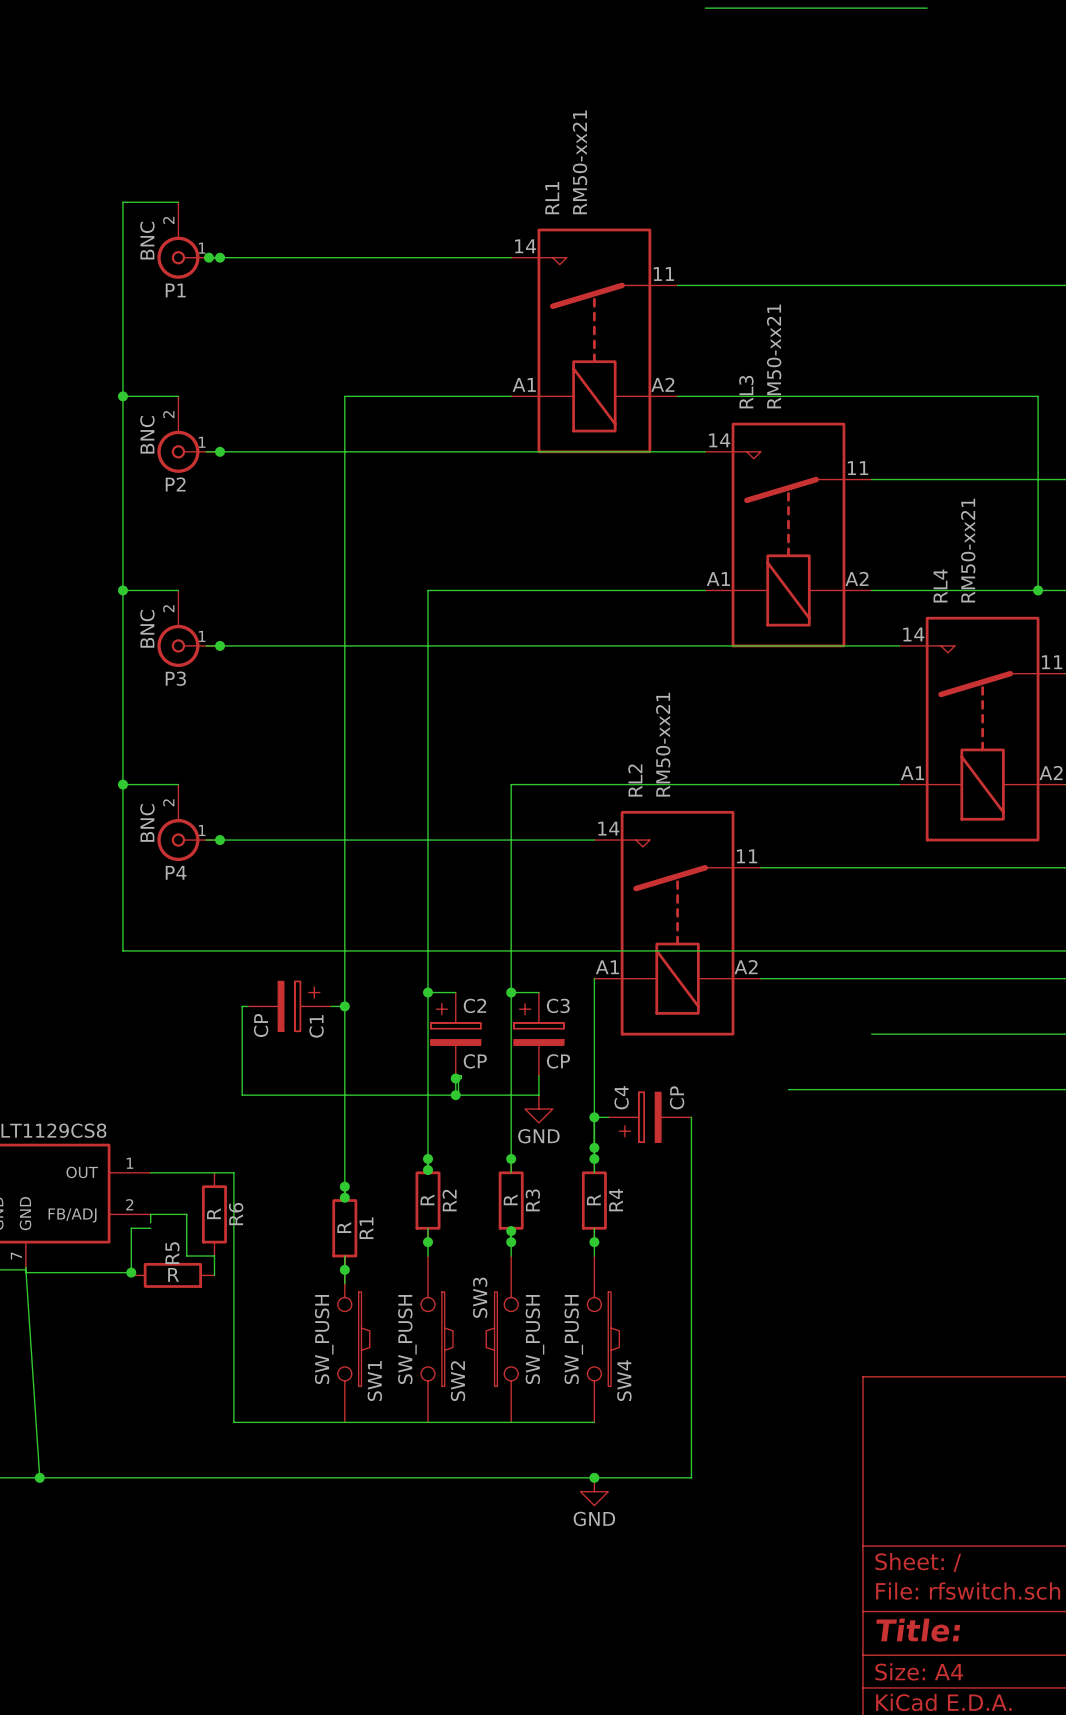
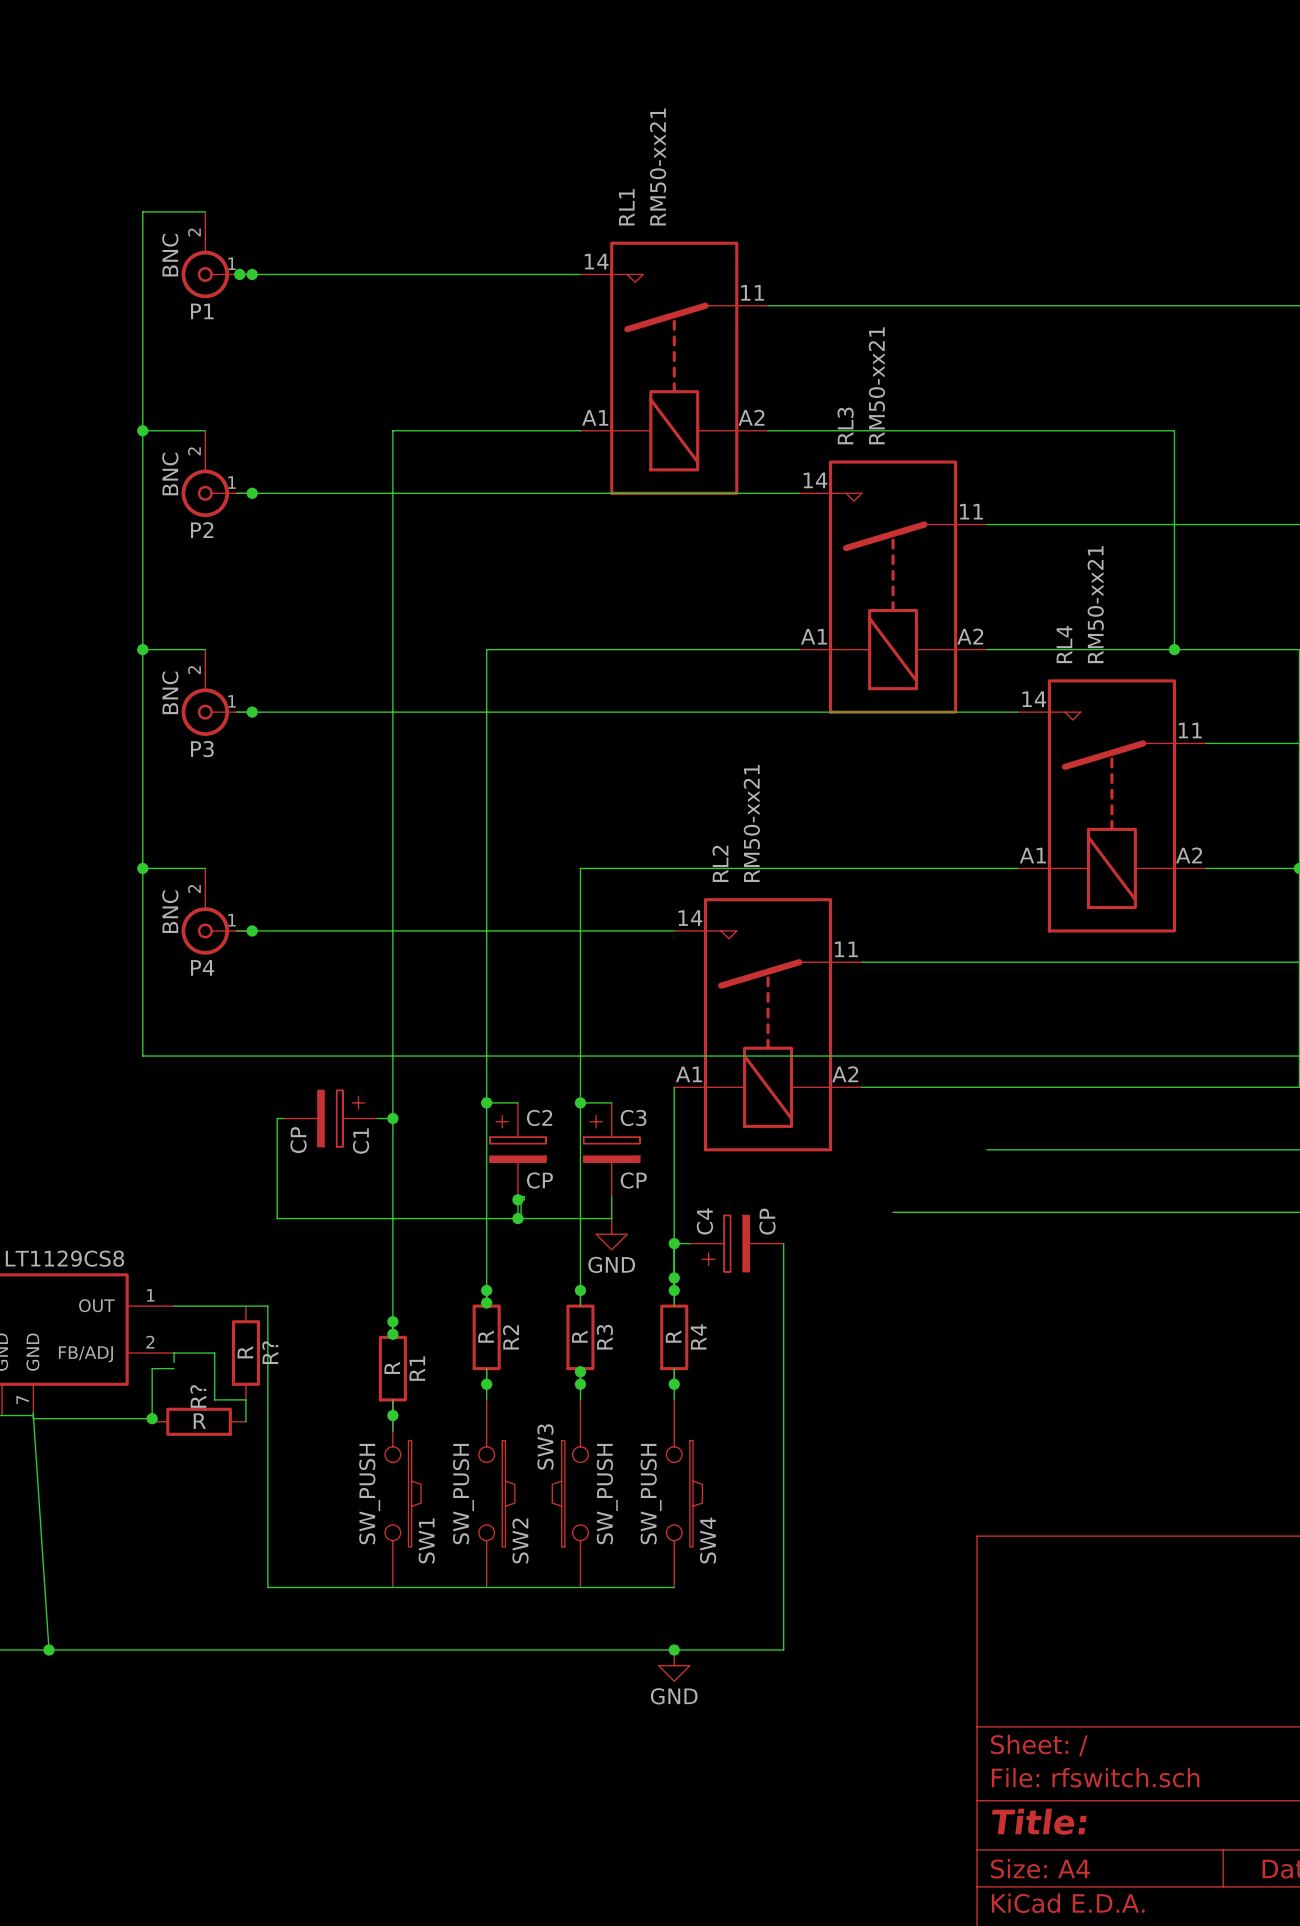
R6 name: R6 (236, 1214) -> R? (270, 1352)
R5 name: R5 (172, 1253) -> R? (198, 1396)

